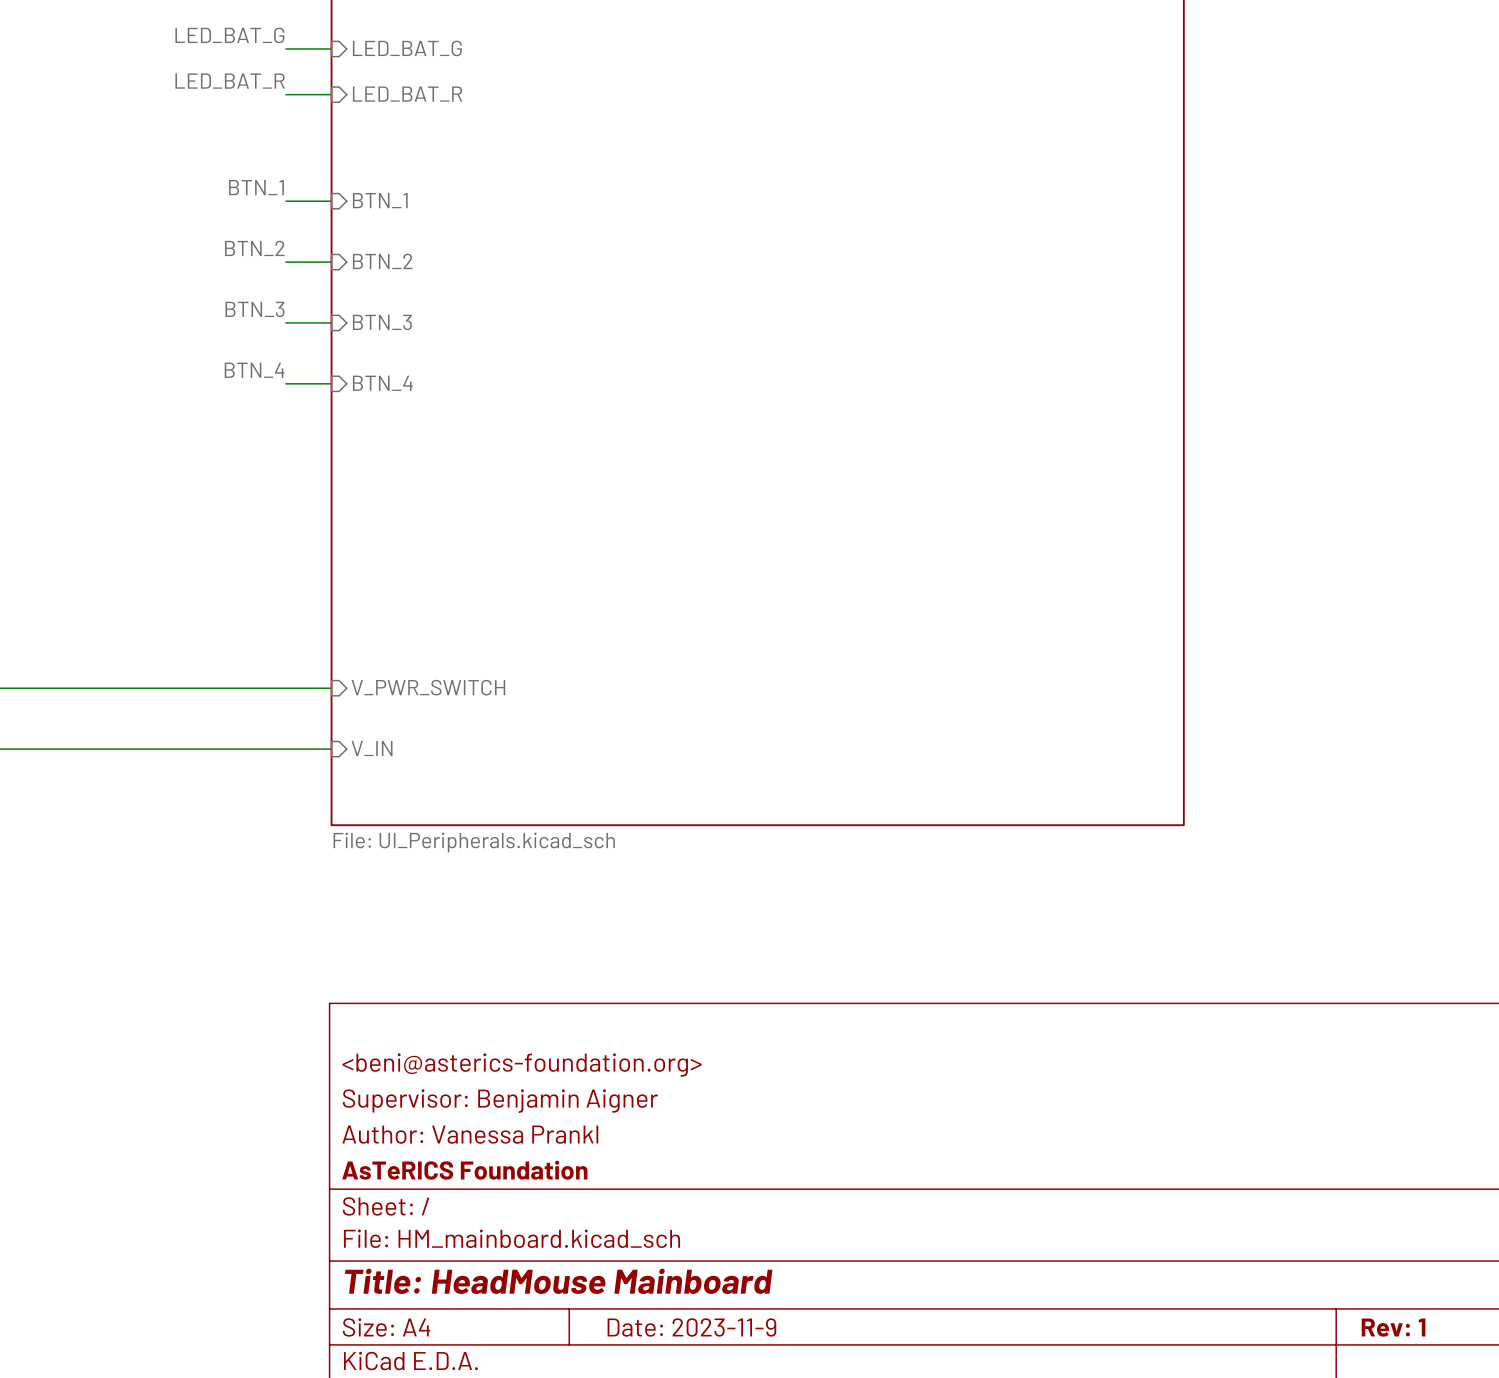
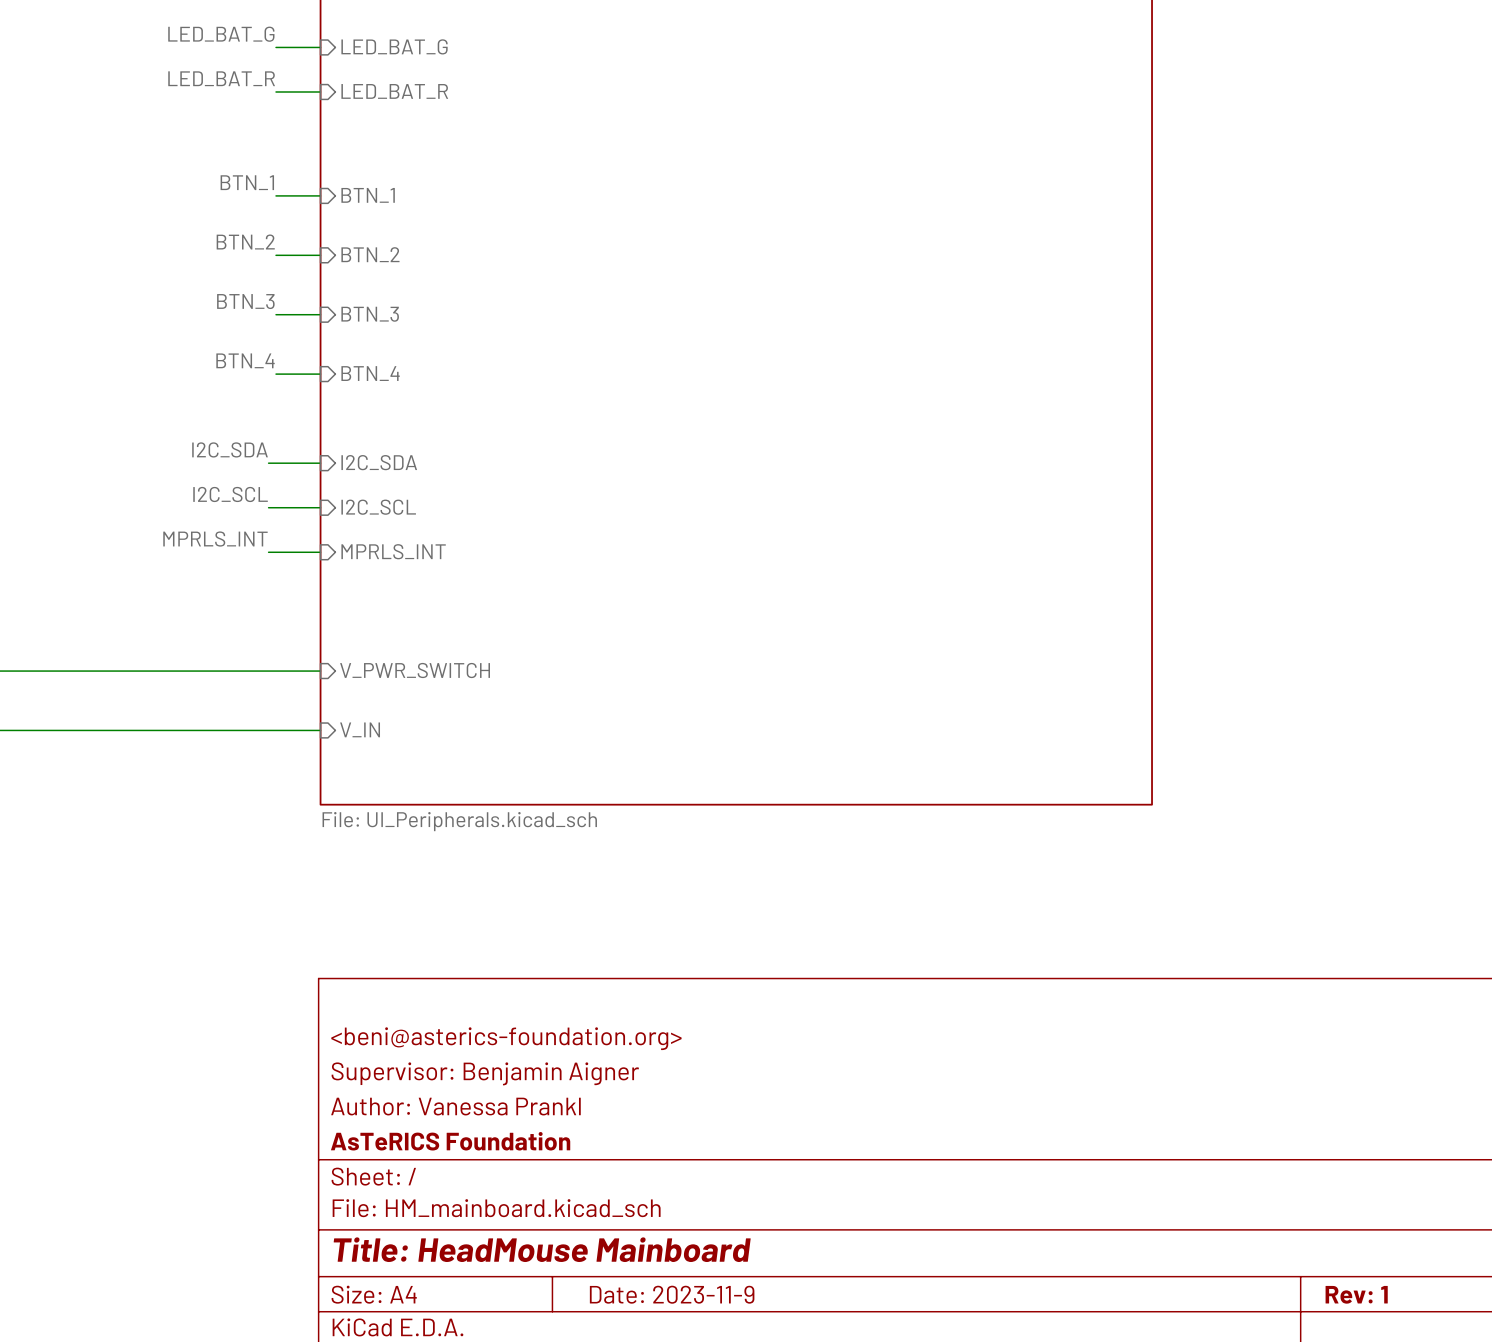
label: none -> I2C_SDA (230, 449)
sheet pin: none -> I2C_SDA (379, 462)
wire: none -> (268, 463) (320, 463)
label: none -> I2C_SCL (230, 494)
wire: none -> (268, 507) (320, 507)
sheet pin: none -> I2C_SCL (378, 507)
label: none -> MPRLS_INT (215, 539)
sheet pin: none -> MPRLS_INT (393, 551)
wire: none -> (268, 552) (320, 552)

